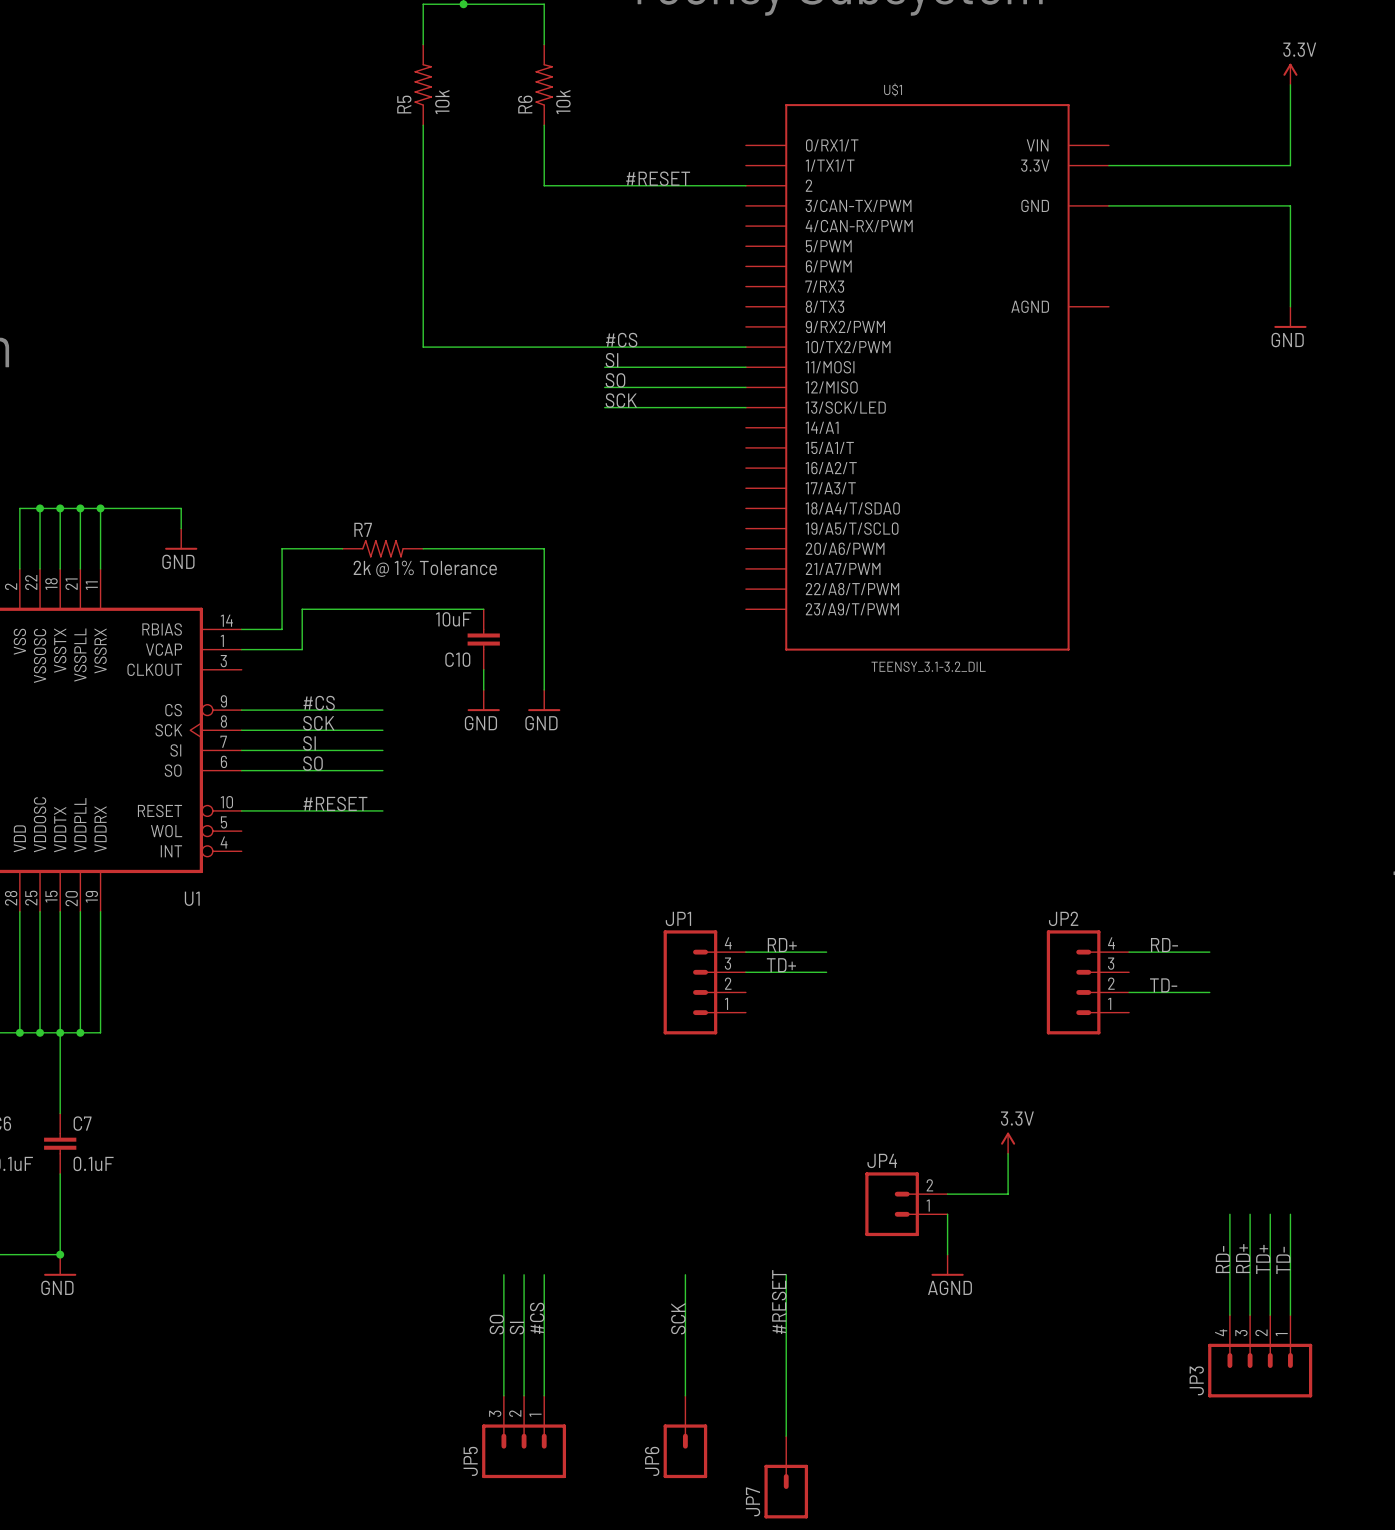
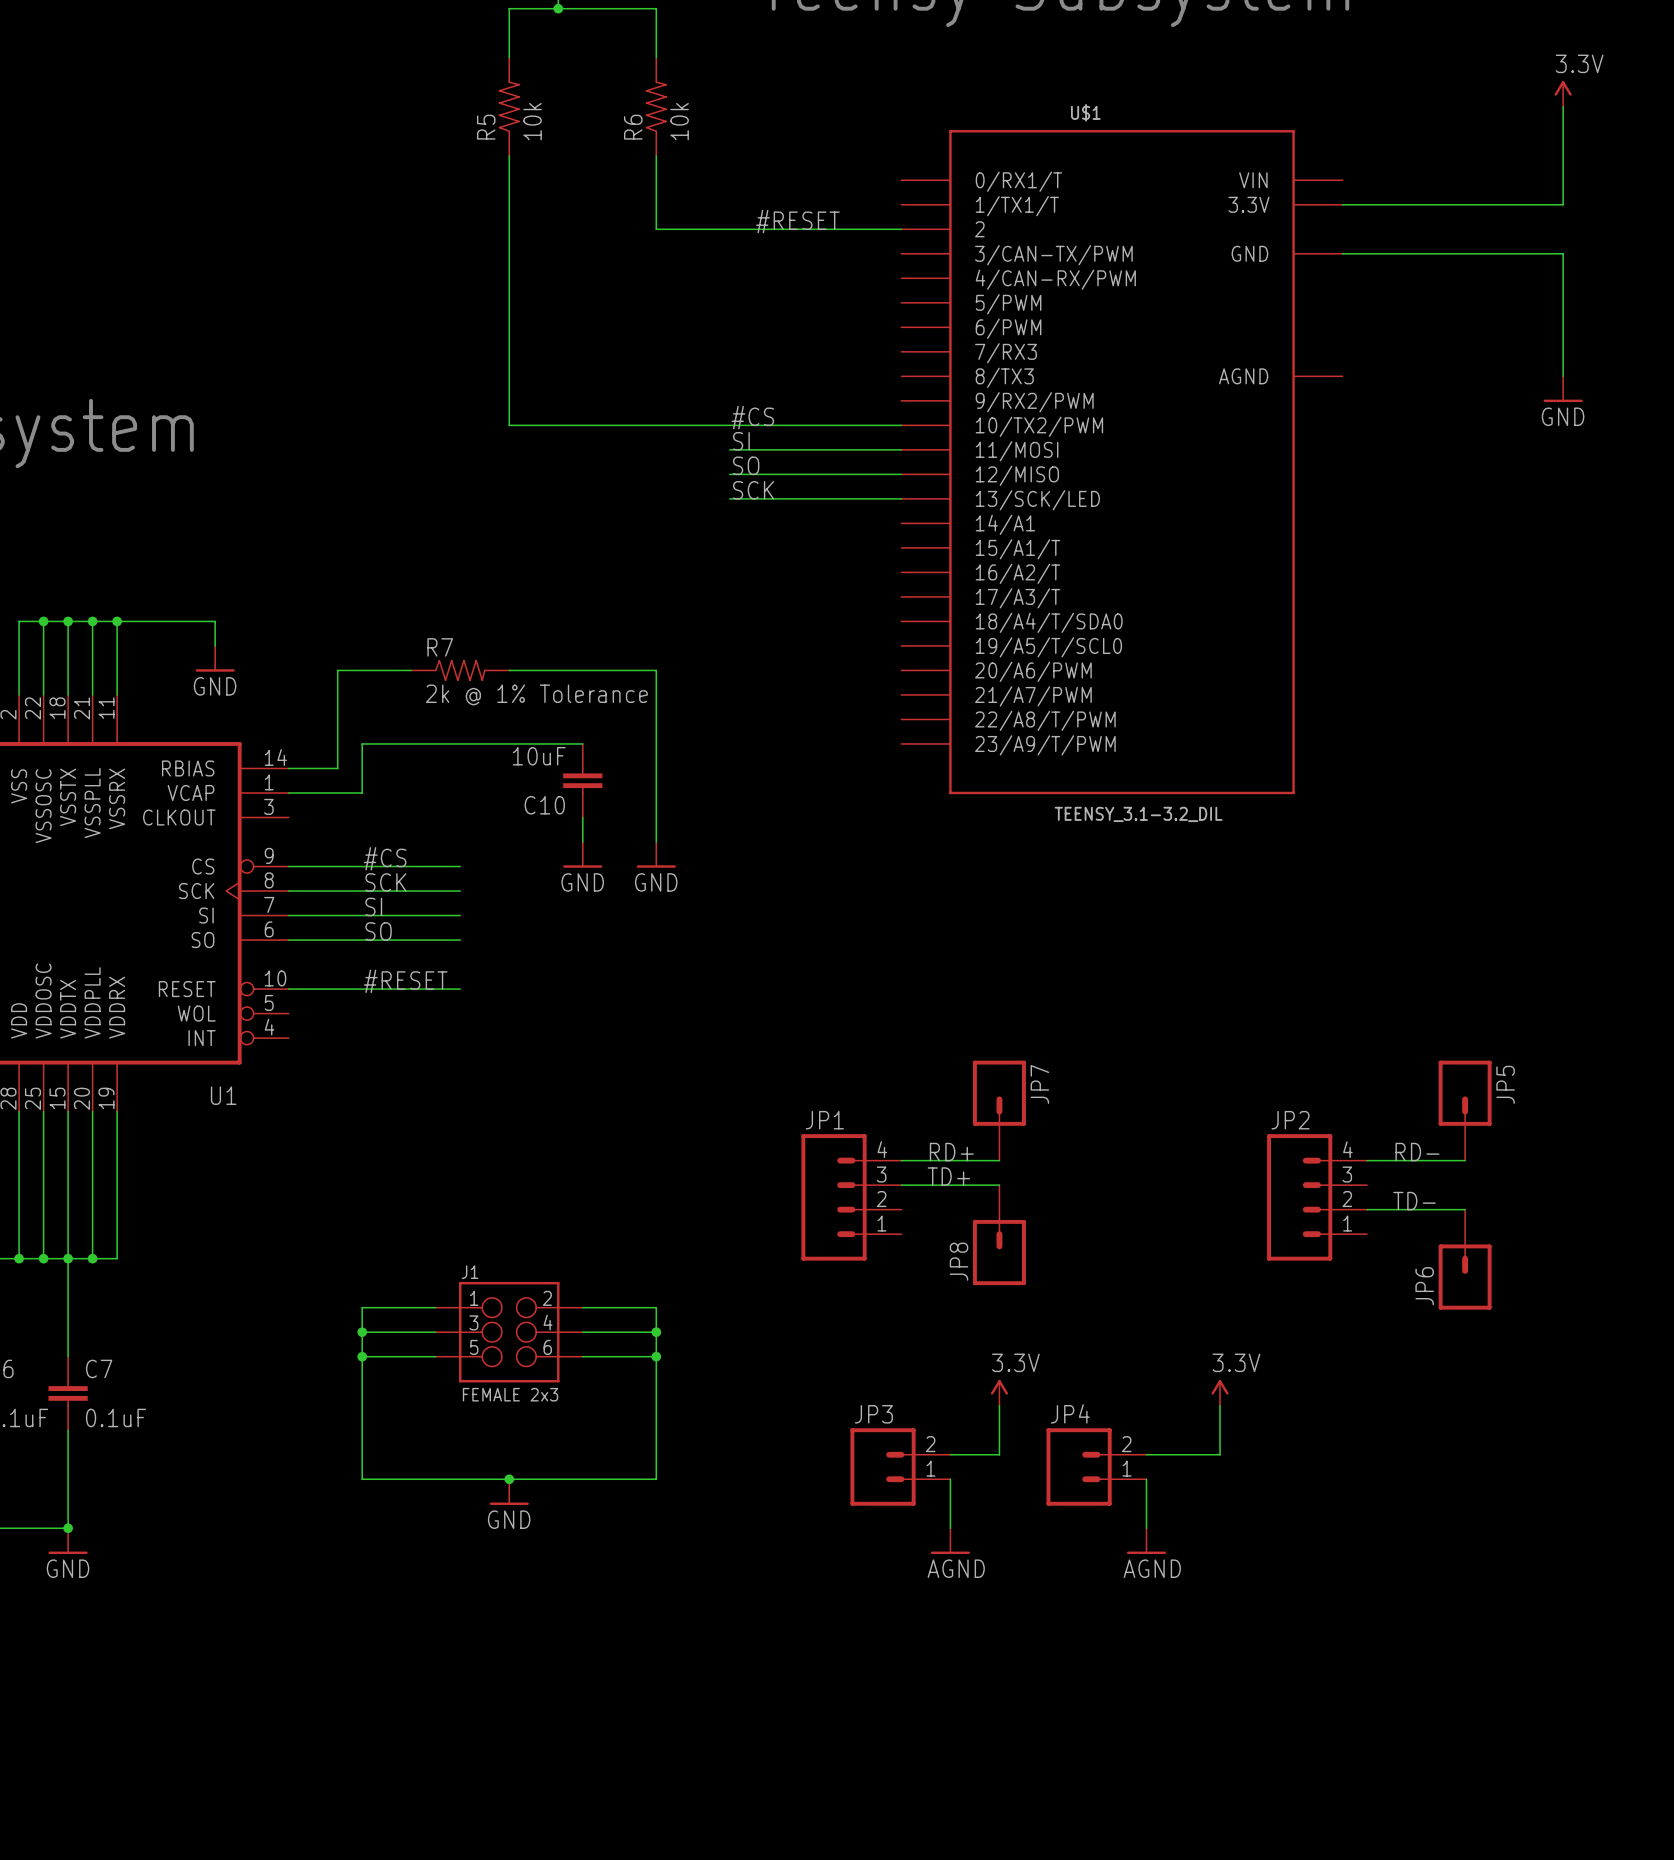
JP8: none -> (999, 1235)
wire: none -> (435, 1307) (362, 1307) (362, 1479) (656, 1479) (656, 1307) (582, 1307)
wire: none -> (362, 1332) (435, 1332)
junction: none -> (362, 1332)
J1: none -> FEMALE 2x3 (509, 1332)
wire: none -> (582, 1332) (656, 1332)
junction: none -> (656, 1332)
wire: none -> (362, 1356) (435, 1356)
junction: none -> (362, 1356)
wire: none -> (582, 1356) (656, 1356)
junction: none -> (656, 1356)
power symbol: none -> 3.3V (999, 1392)
wire: none -> (999, 1405) (999, 1454) (950, 1454)
junction: none -> (509, 1479)
wire: none -> (950, 1479) (950, 1528)
wire: (1229, 1214) (1229, 1315) -> none
wire: (1250, 1214) (1250, 1315) -> none
wire: (1270, 1214) (1270, 1315) -> none
wire: (1290, 1214) (1290, 1315) -> none
power symbol: none -> GND (509, 1492)
label: RD+ (1243, 1258) -> none
label: RD- (1222, 1259) -> none
label: TD+ (1263, 1259) -> none
label: TD- (1283, 1260) -> none
power symbol: none -> AGND (950, 1541)
wire: (503, 1274) (503, 1395) -> none
wire: (524, 1274) (524, 1395) -> none
wire: (544, 1274) (544, 1395) -> none
wire: (685, 1274) (685, 1395) -> none
wire: (786, 1274) (786, 1436) -> none
label: #RESET (779, 1302) -> none
JP3 symbol: [1208, 1315, 1313, 1398] -> [850, 1428, 951, 1506]
label: #CS (537, 1318) -> none
label: SCK (678, 1318) -> none
label: SO (496, 1324) -> none
label: SI (517, 1328) -> none
JP3 name position: JP3 (1196, 1380) -> JP3 (873, 1414)
JP5 symbol: [482, 1395, 567, 1479] -> [1438, 1060, 1492, 1161]
JP6 position: (685, 1436) -> (1465, 1259)
JP5 name position: JP5 (470, 1461) -> JP5 (1505, 1084)
JP7 position: (786, 1477) -> (999, 1110)
JP7 rotation: 0° (786, 1491) -> 180° (999, 1093)

